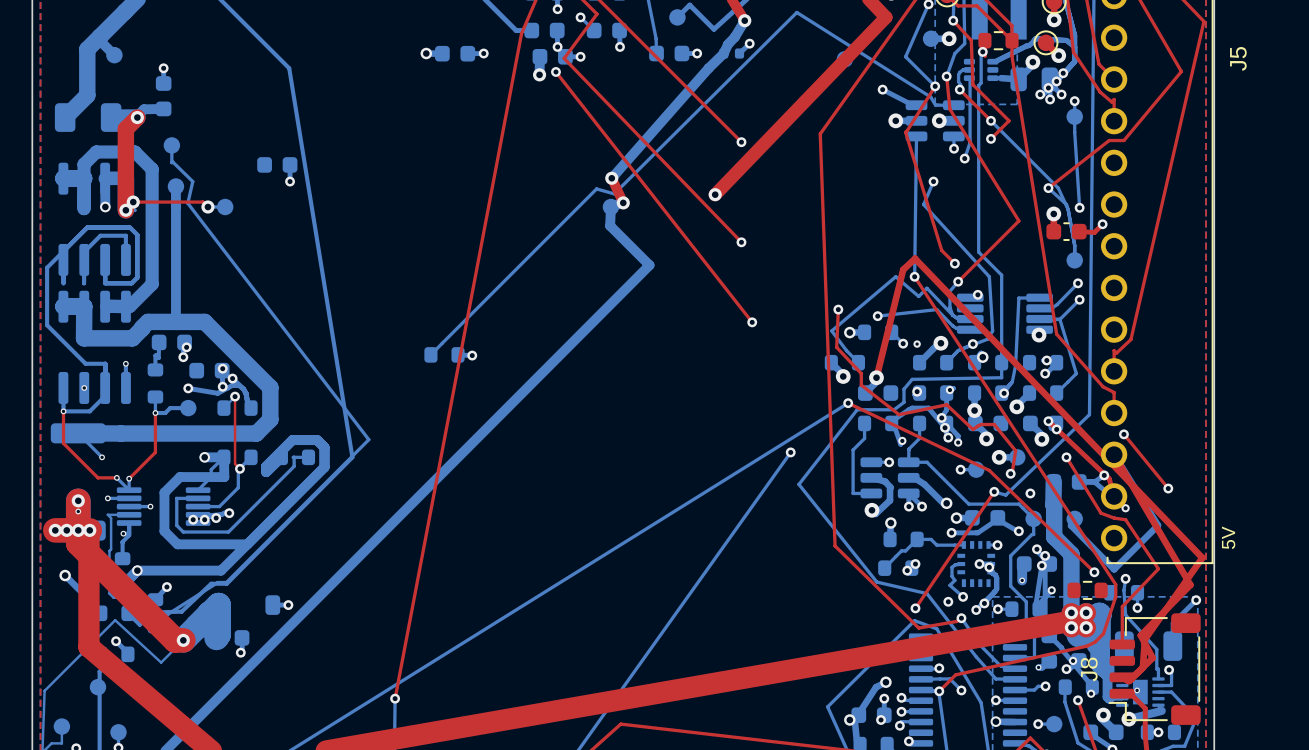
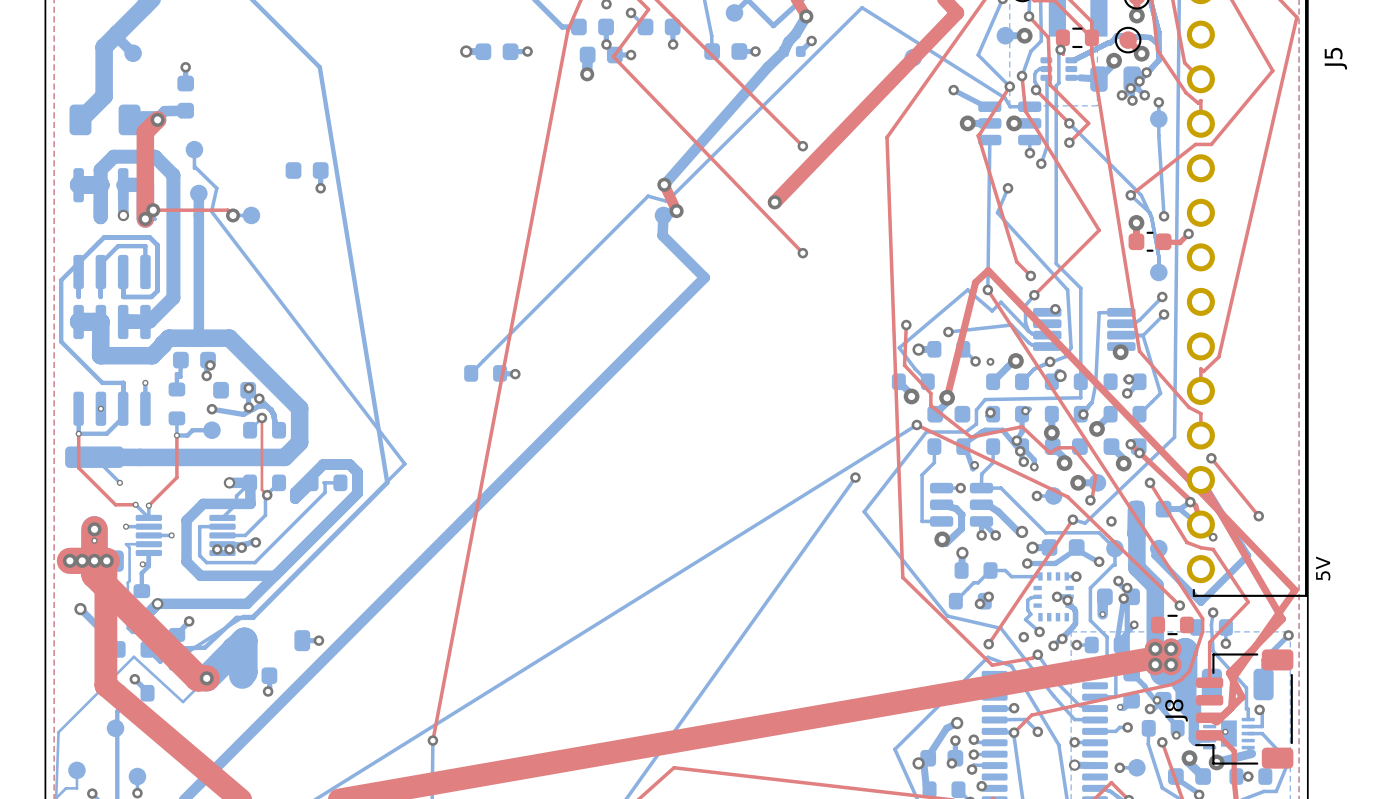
top track: (555, 71) (752, 322) -> none
via: (555, 71) -> none
via: (752, 322) -> none

